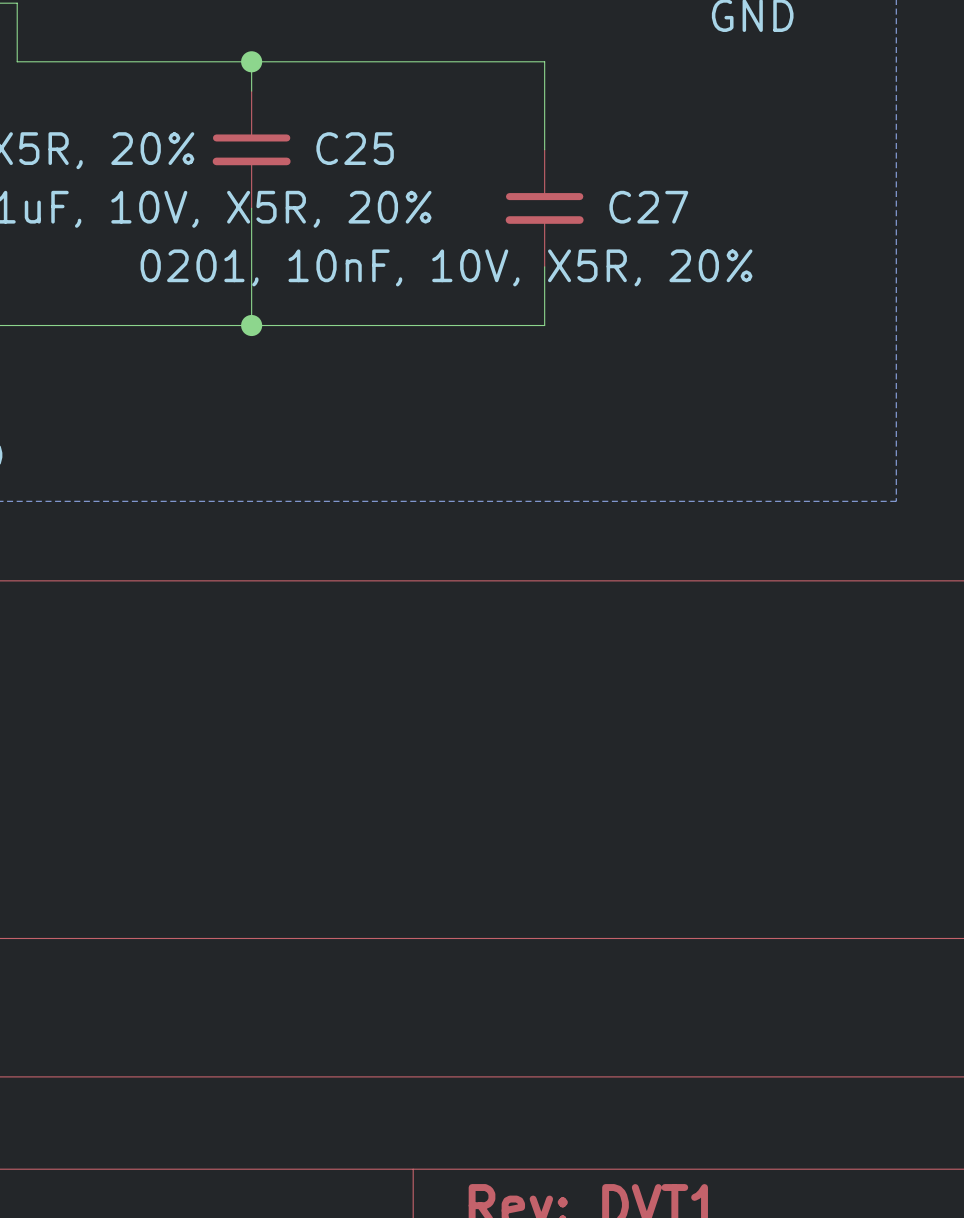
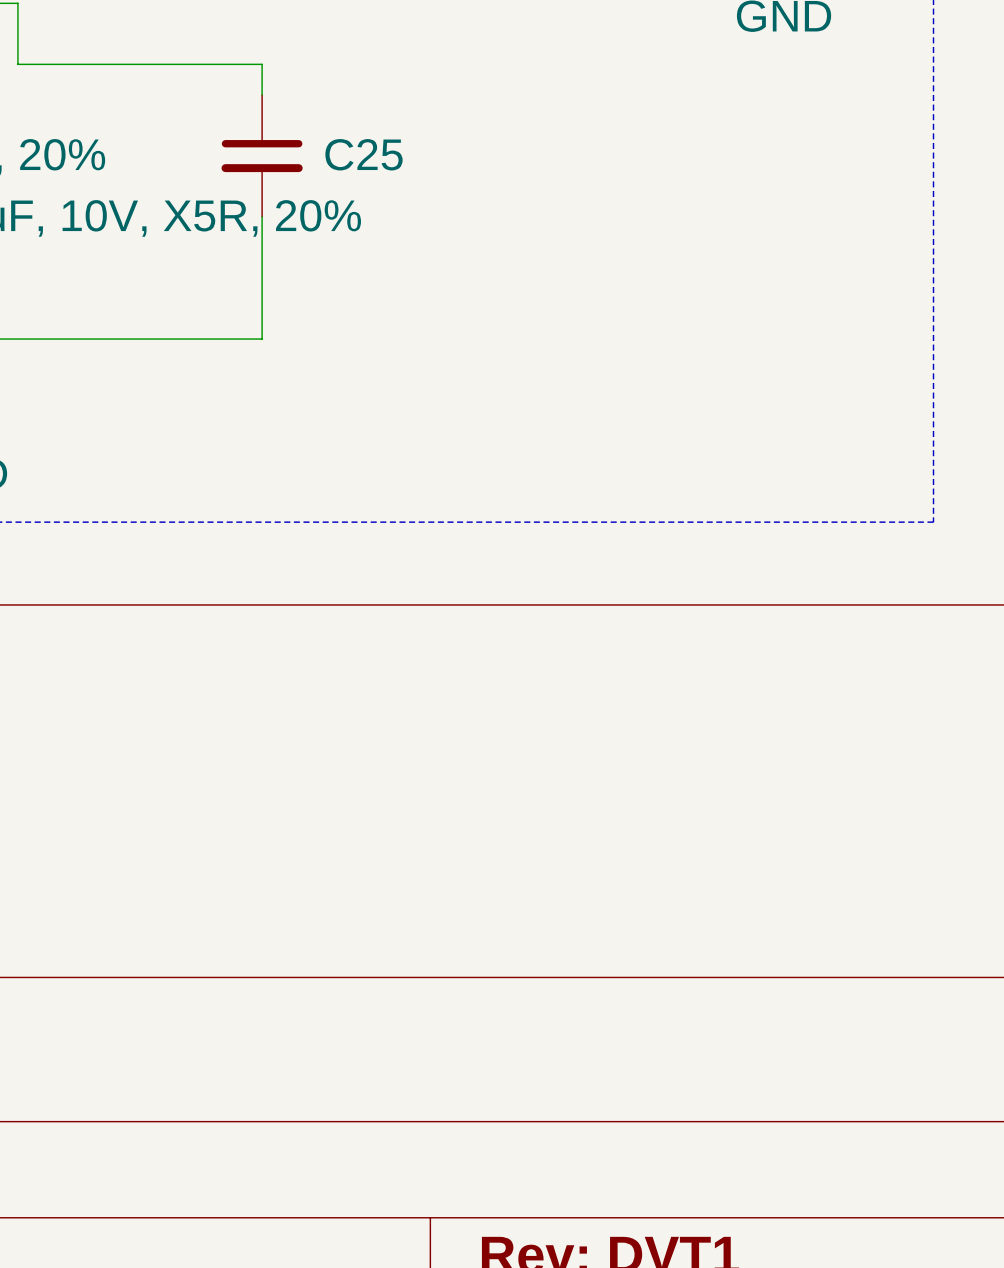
wire: (251, 61) (544, 61) (544, 149) -> none
junction: (251, 61) -> none
C27: 0201, 10nF, 10V, X5R, 20% (544, 208) -> none
wire: (544, 266) (544, 325) (251, 325) -> none
junction: (251, 325) -> none

